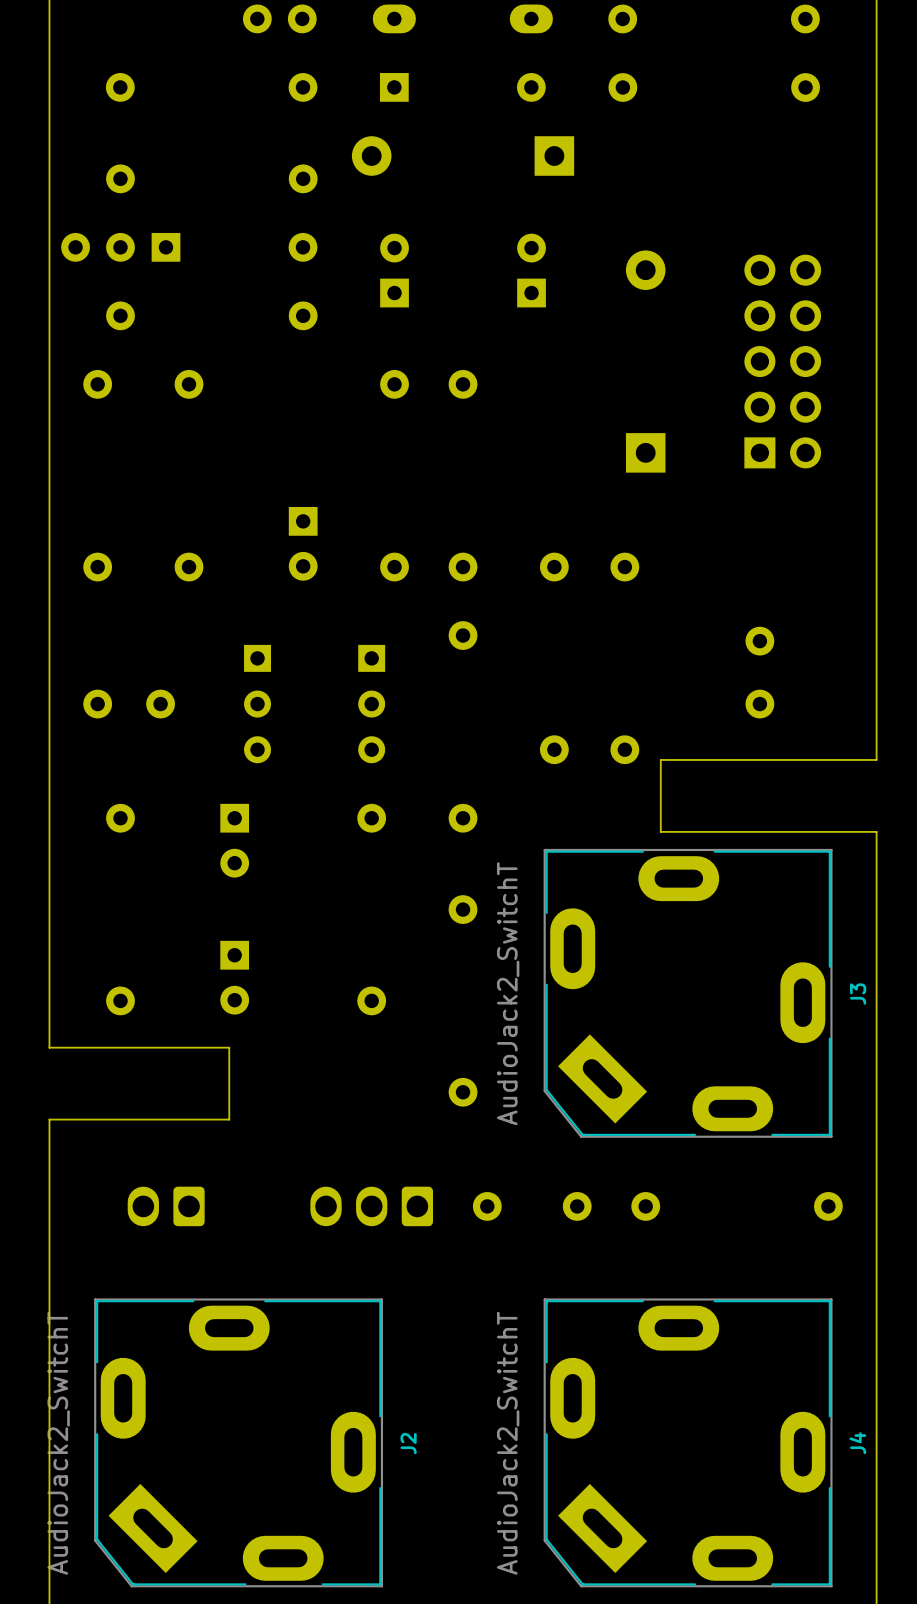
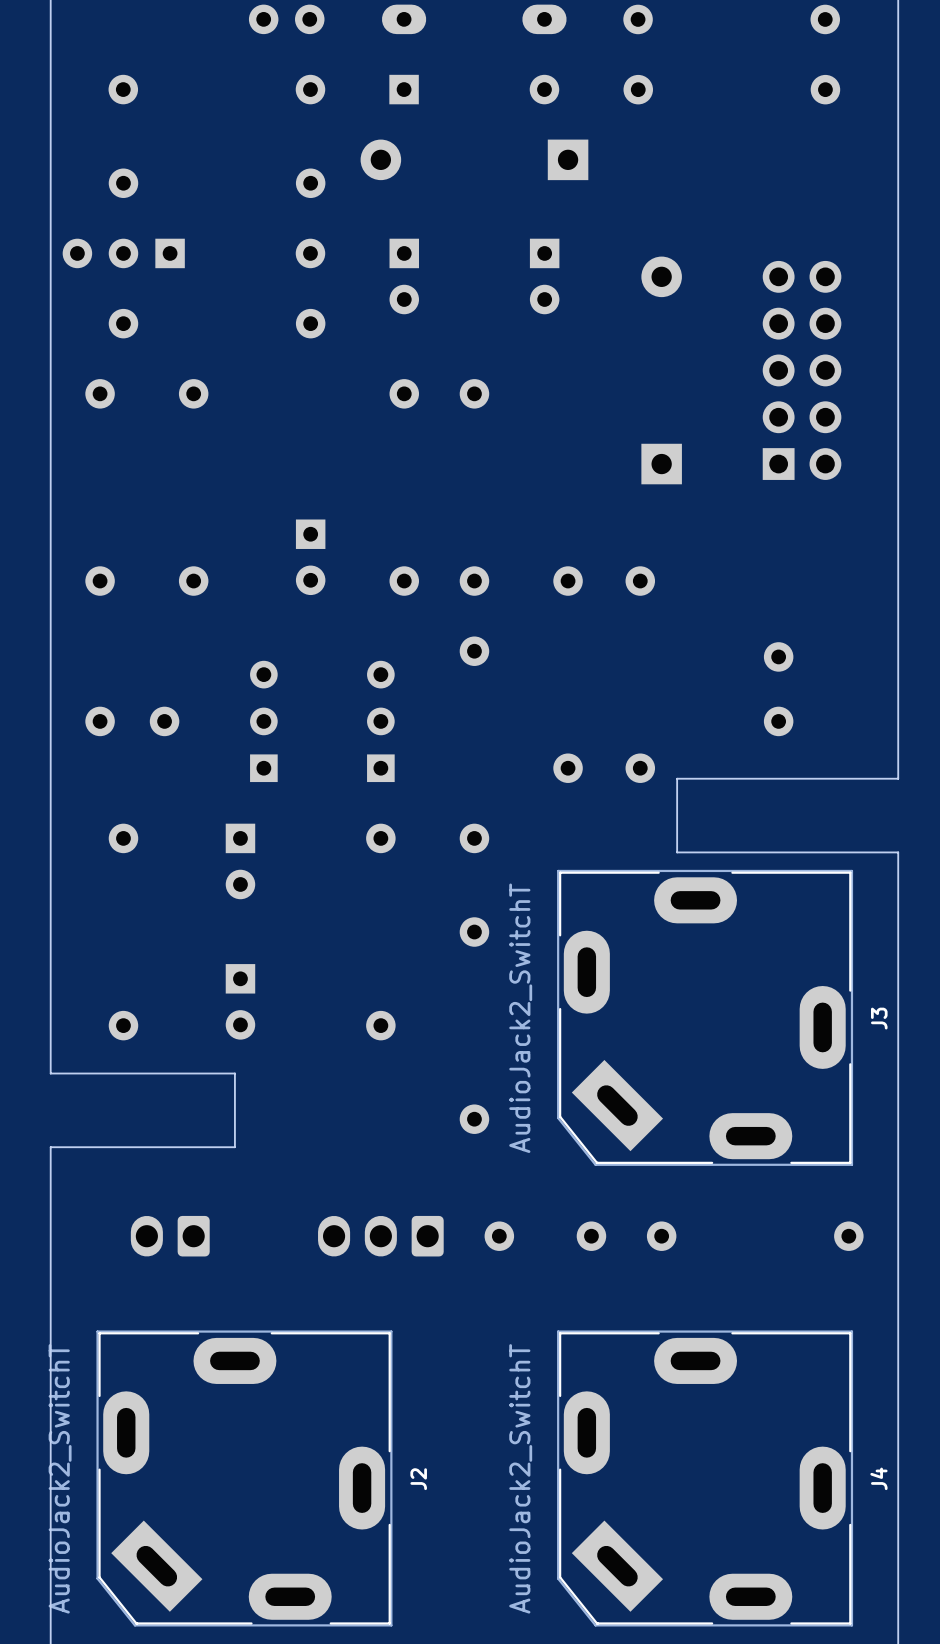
part rotation: 0° (394, 270) -> 180° (404, 276)
part rotation: 0° (531, 270) -> 180° (544, 276)
part rotation: 0° (257, 704) -> 180° (263, 721)
part rotation: 0° (371, 704) -> 180° (380, 721)

